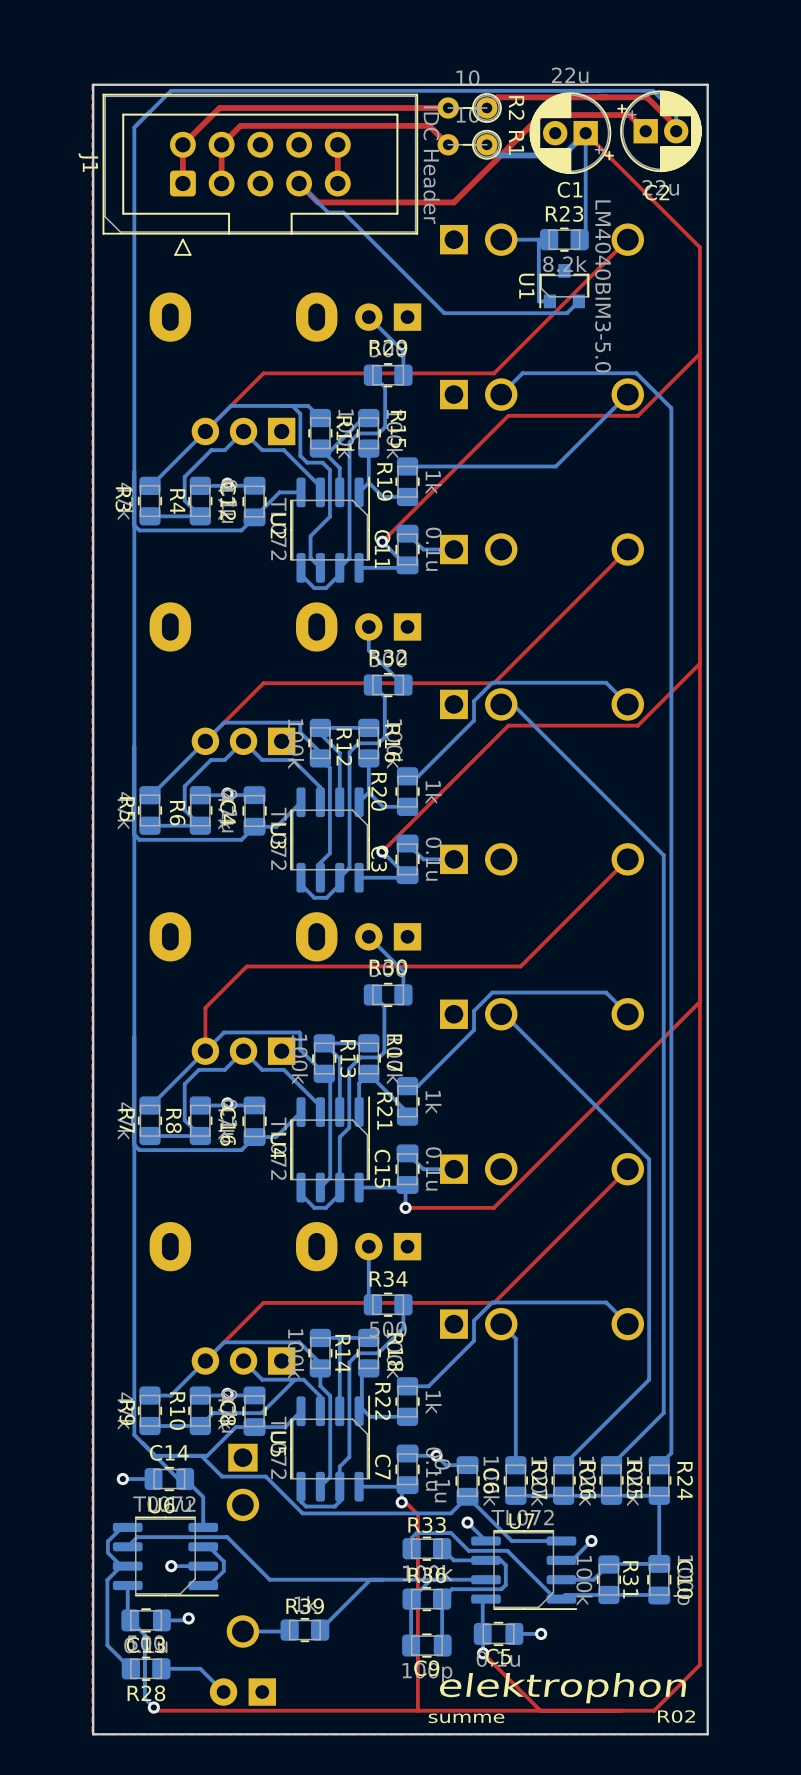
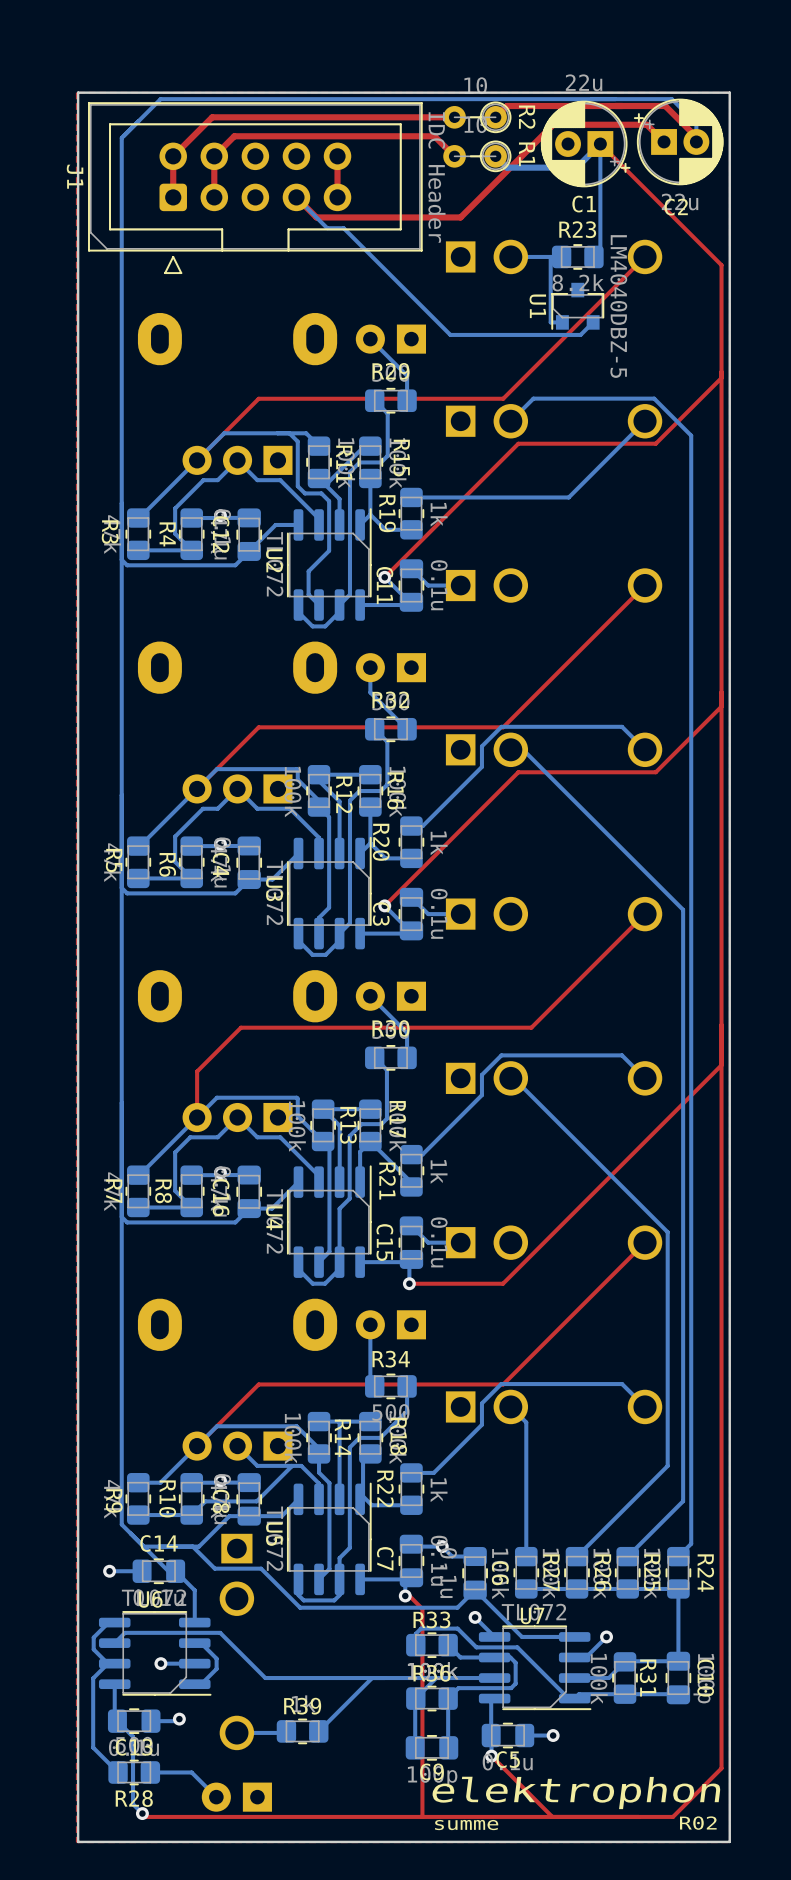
U1 value: LM4040BIM3-5.0 (603, 286) -> LM4040DBZ-5 (618, 306)

